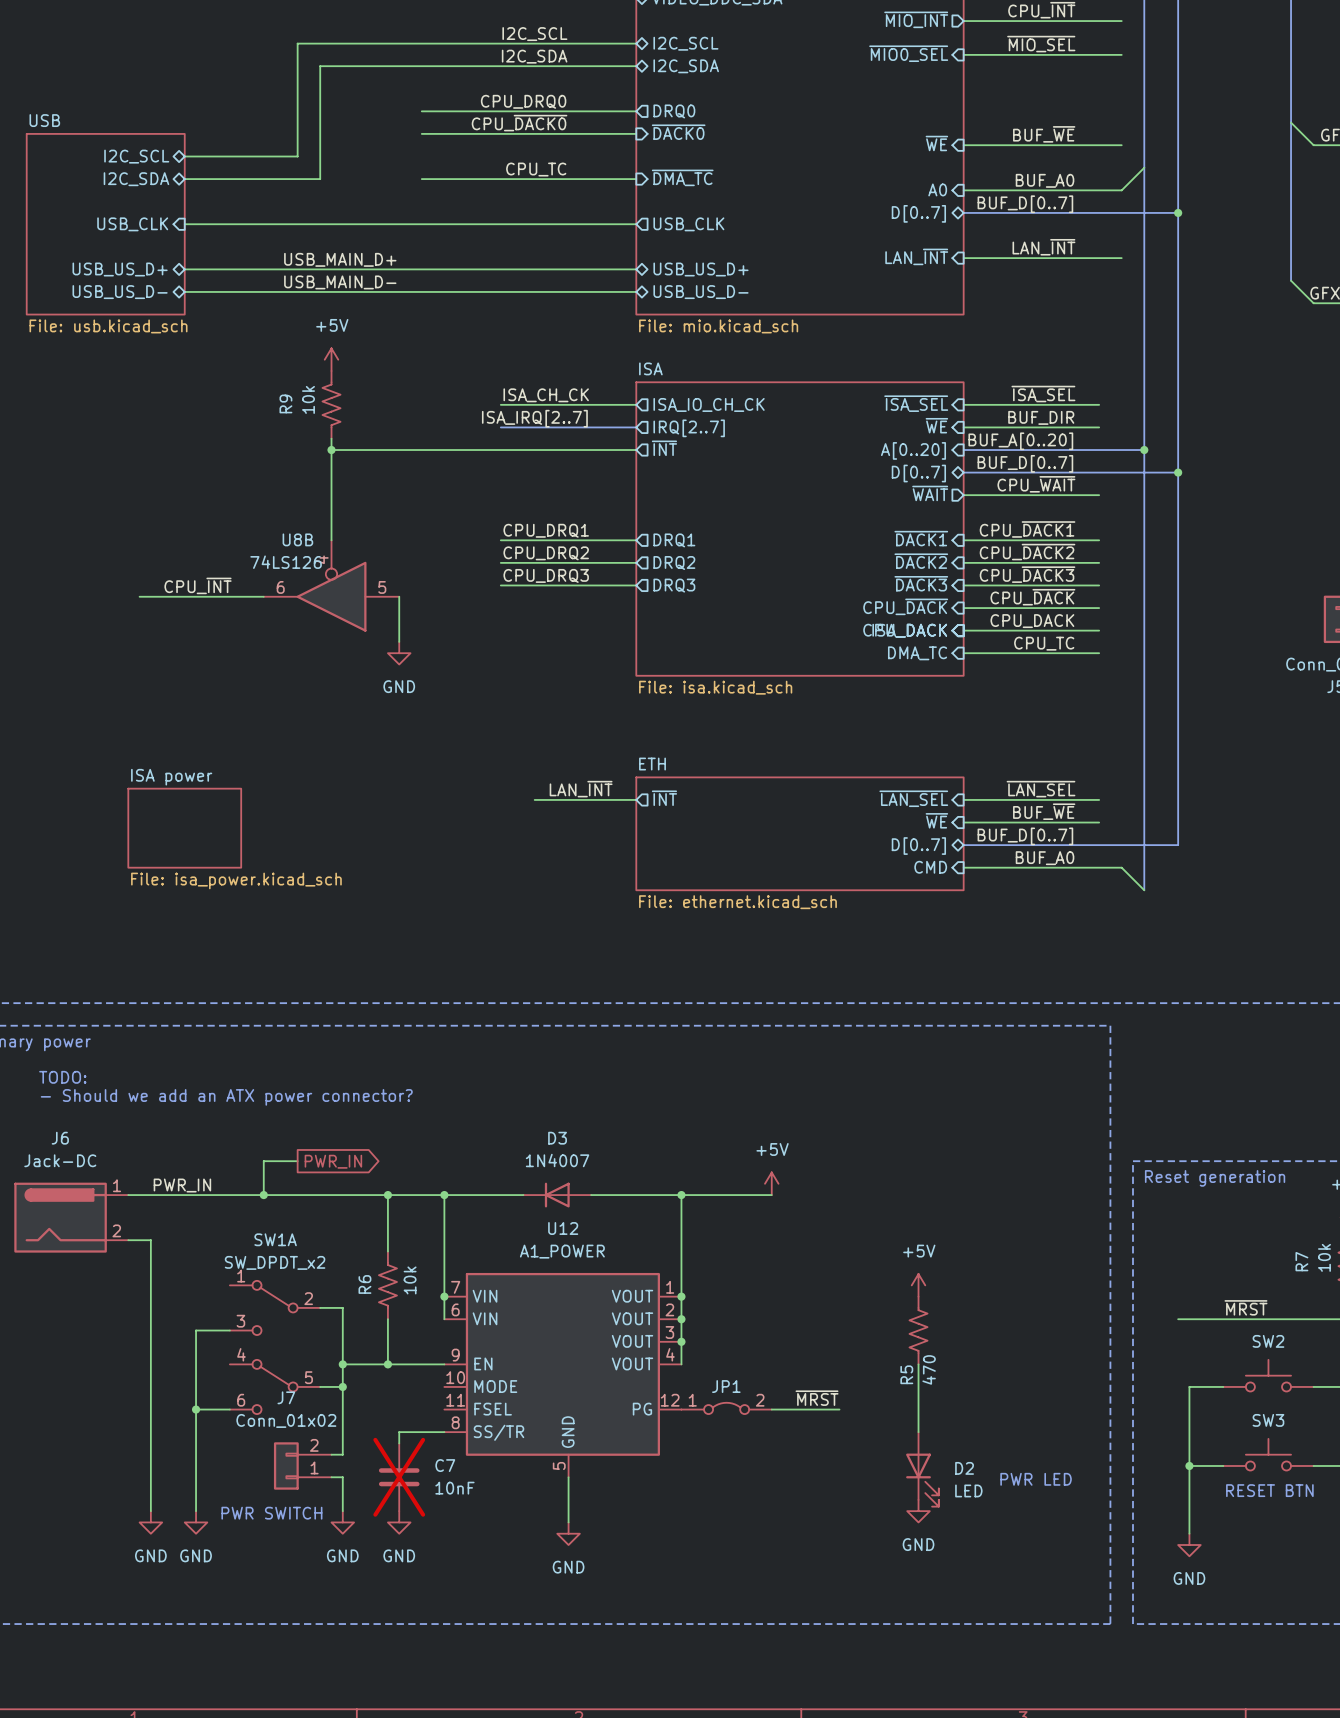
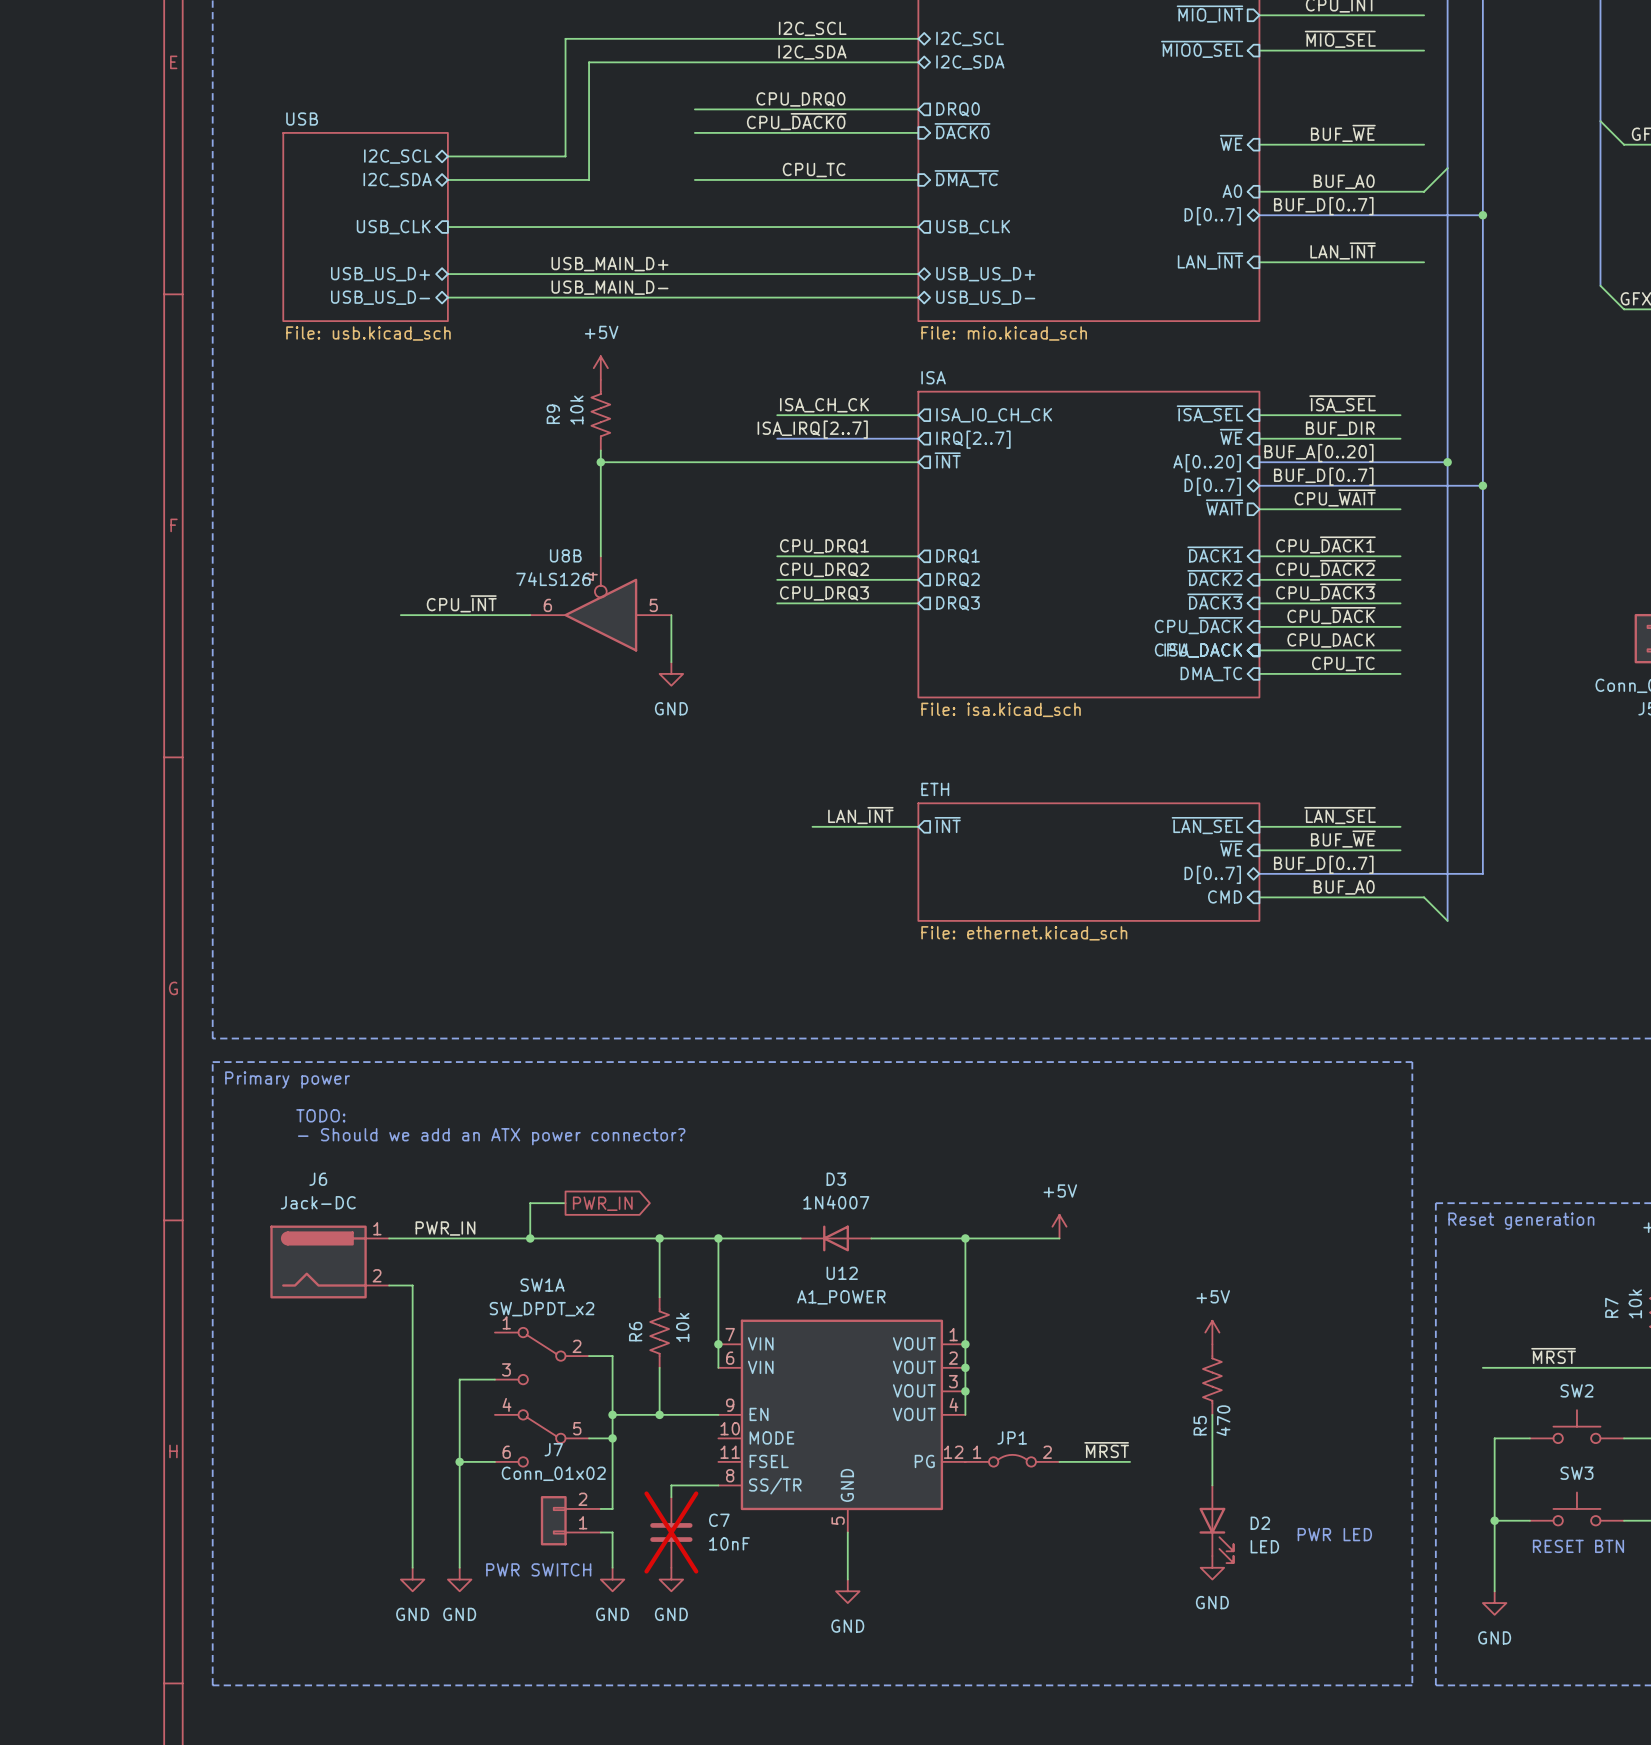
sheet ISA power: File: isa_power.kicad_sch (184, 828) -> none

